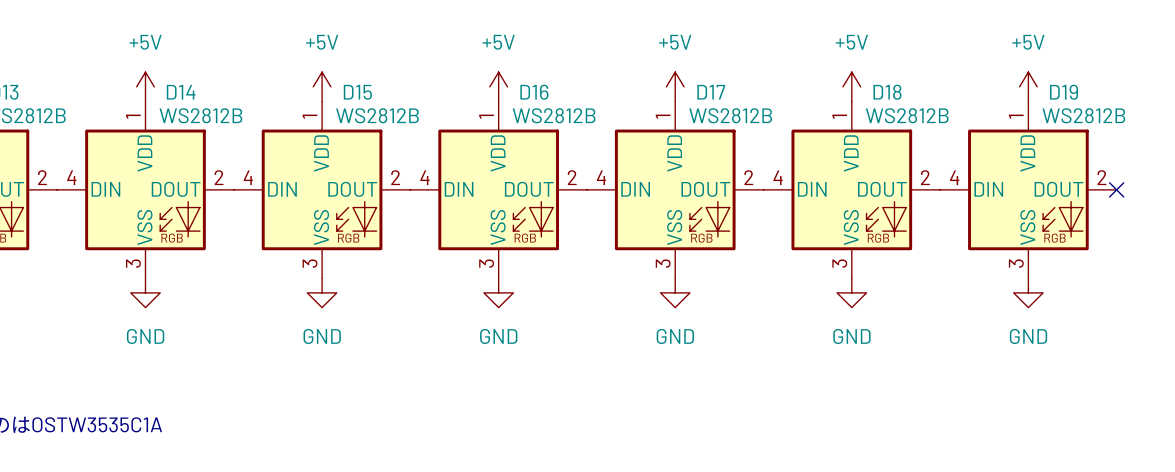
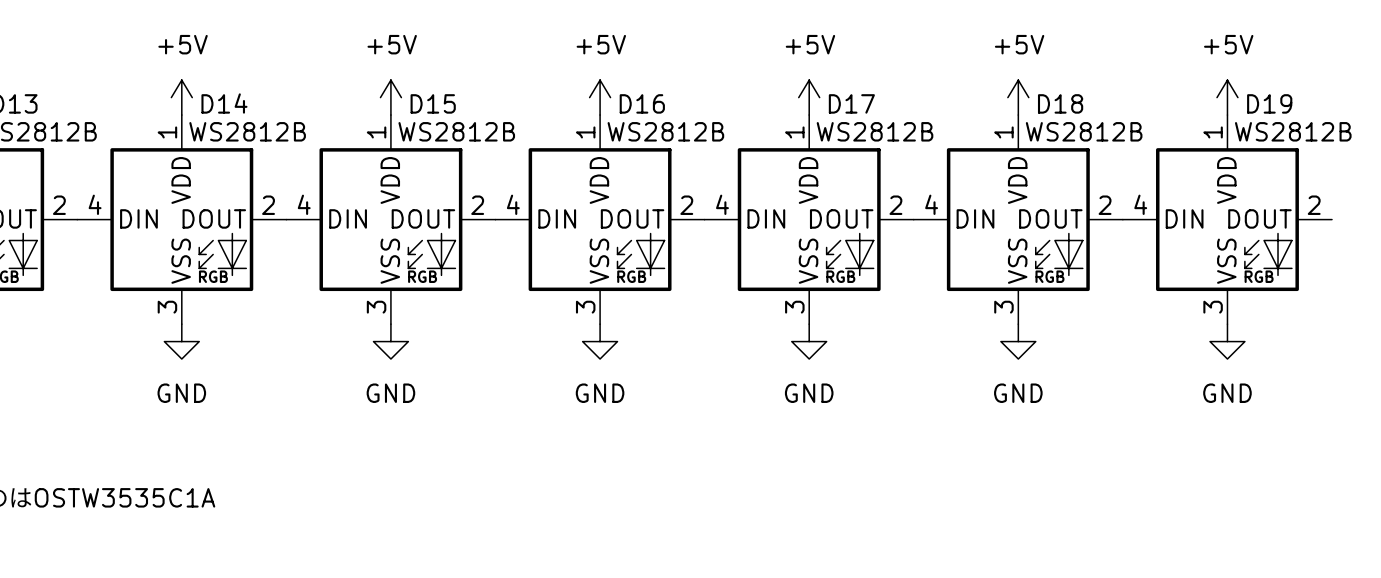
no-connect mark: (1116, 189) -> none

